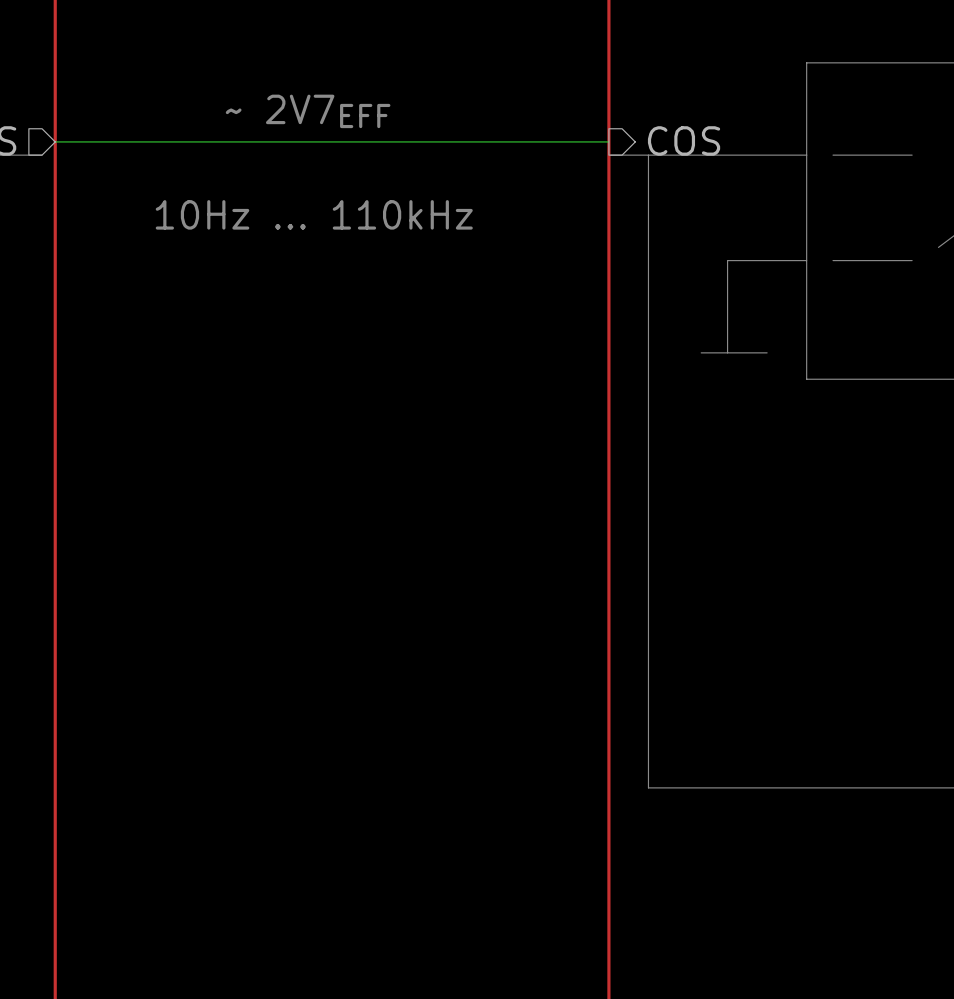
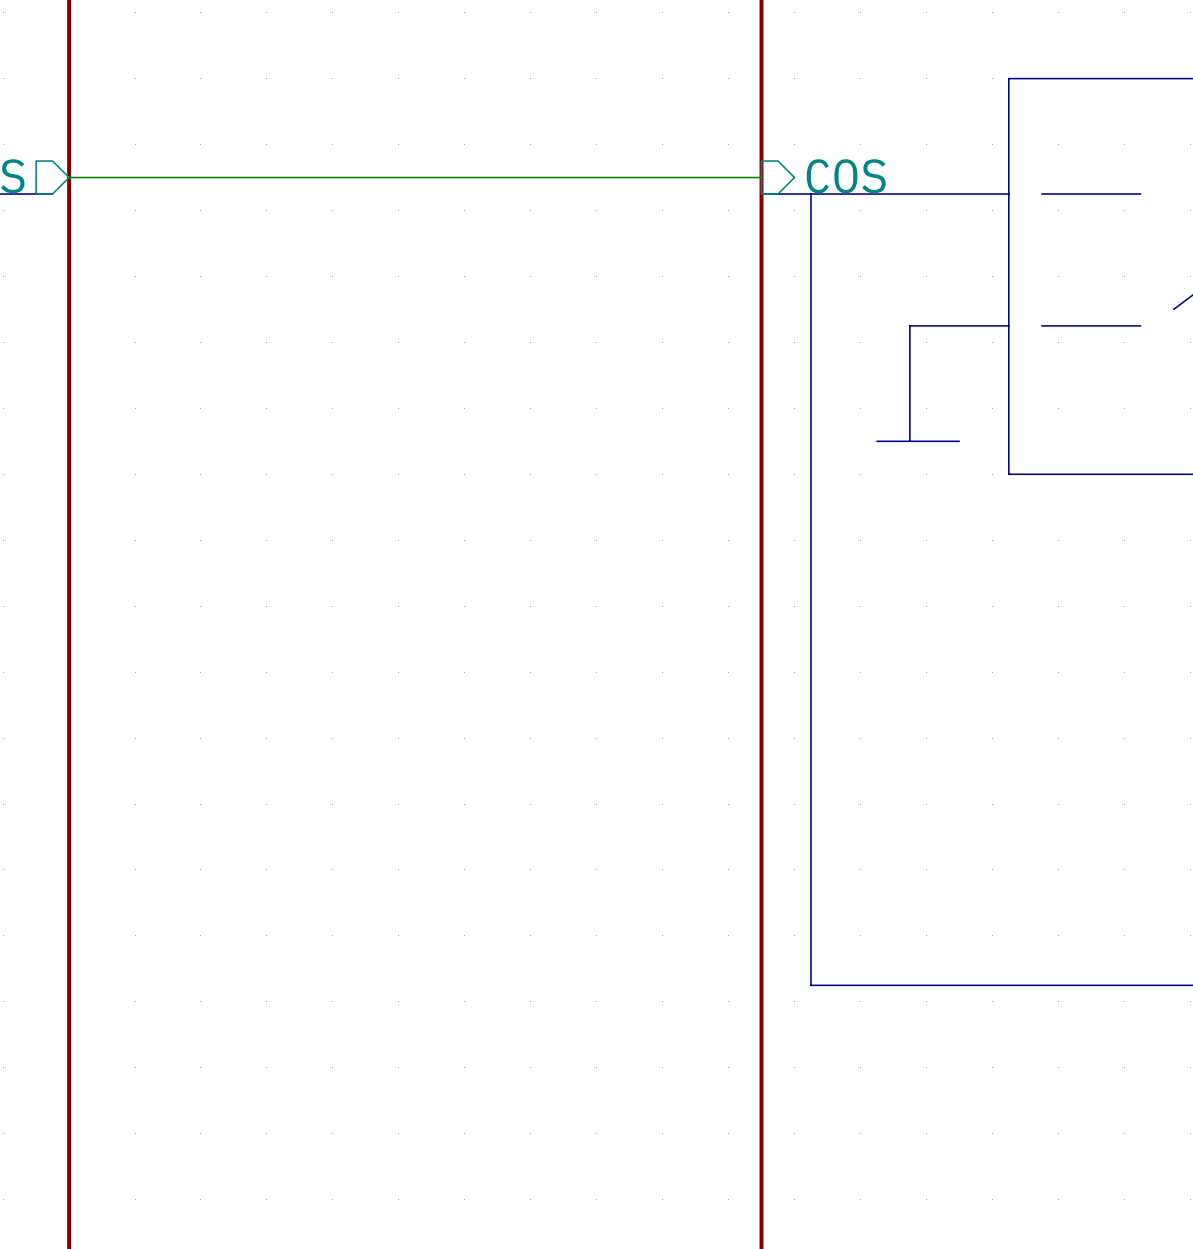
text: ~ 2V7EFF (308, 111) -> none
text: 10Hz ... 110kHz (314, 214) -> none

